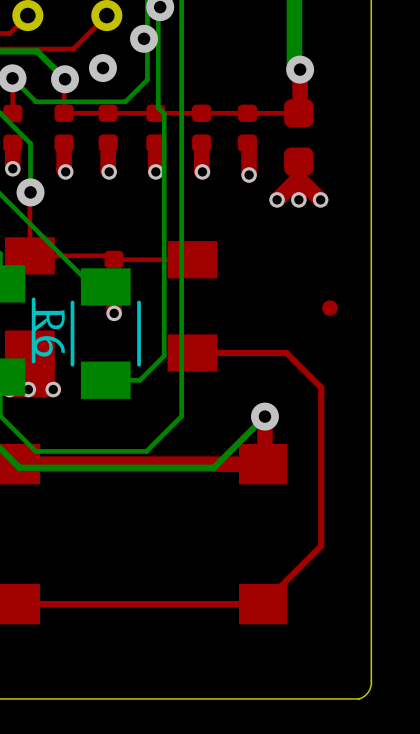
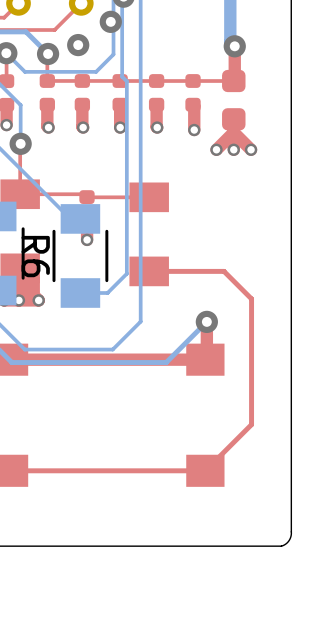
part: (329, 308) -> none

